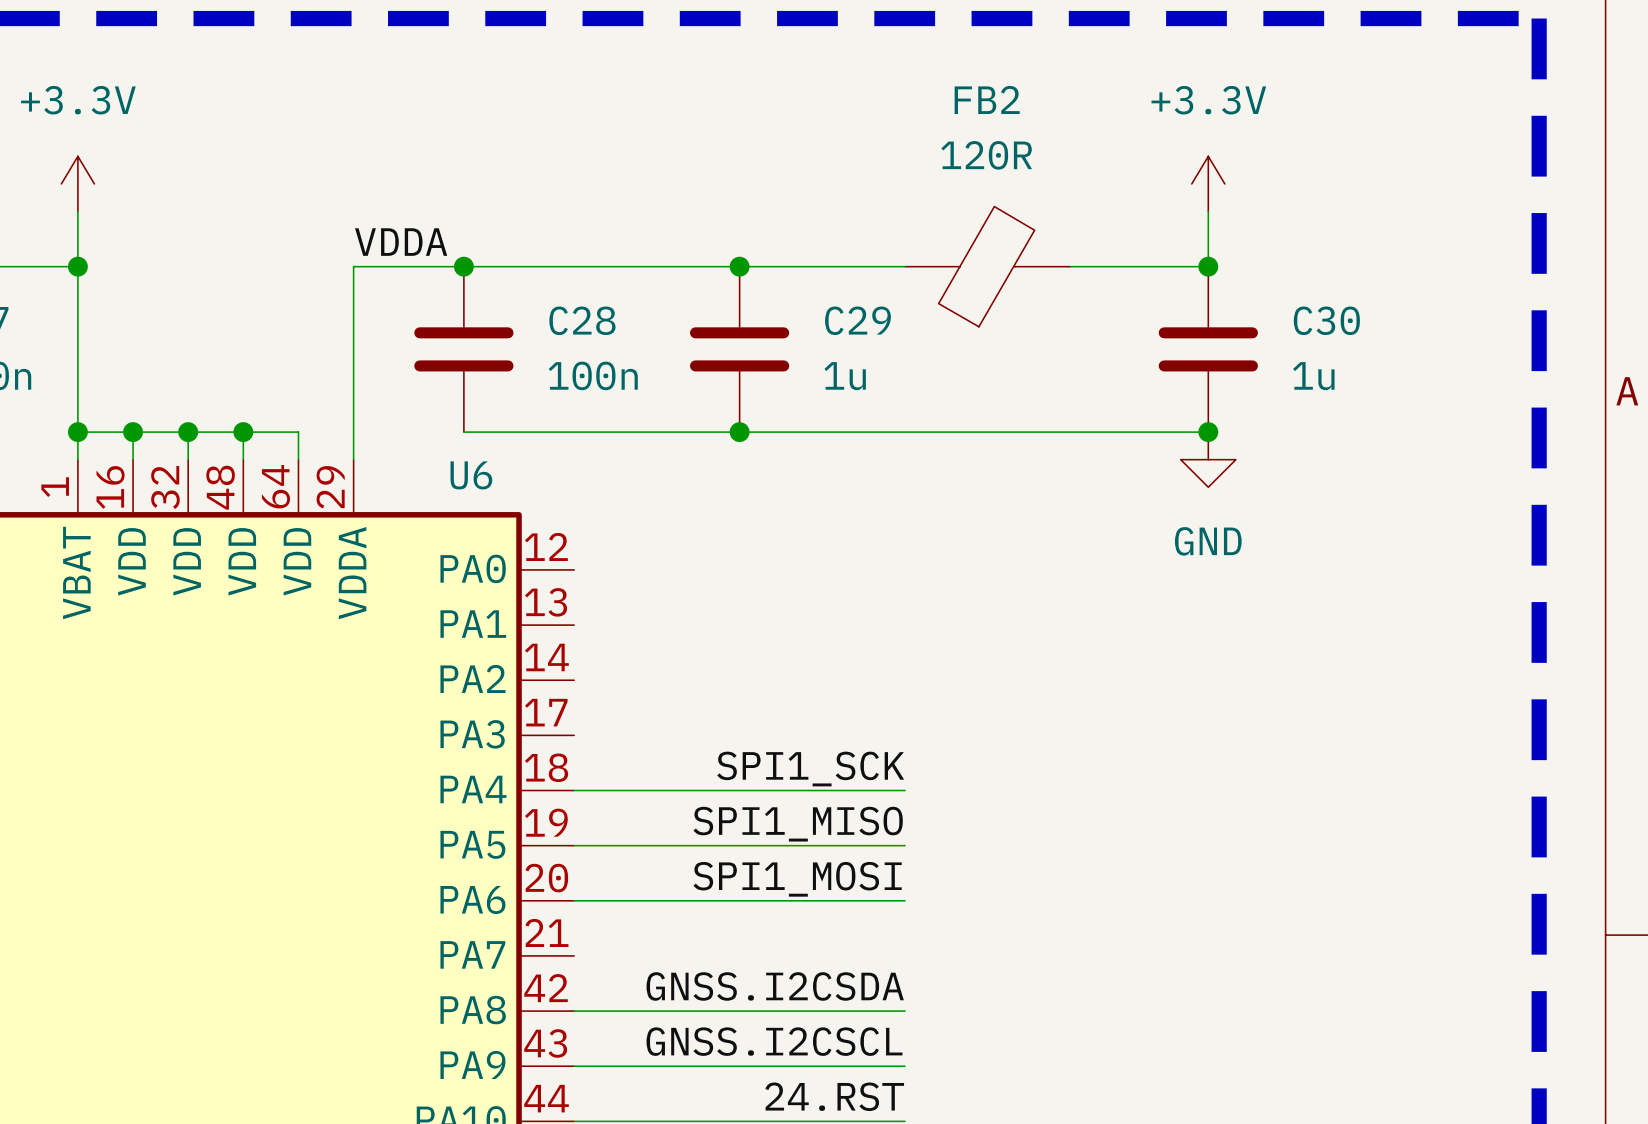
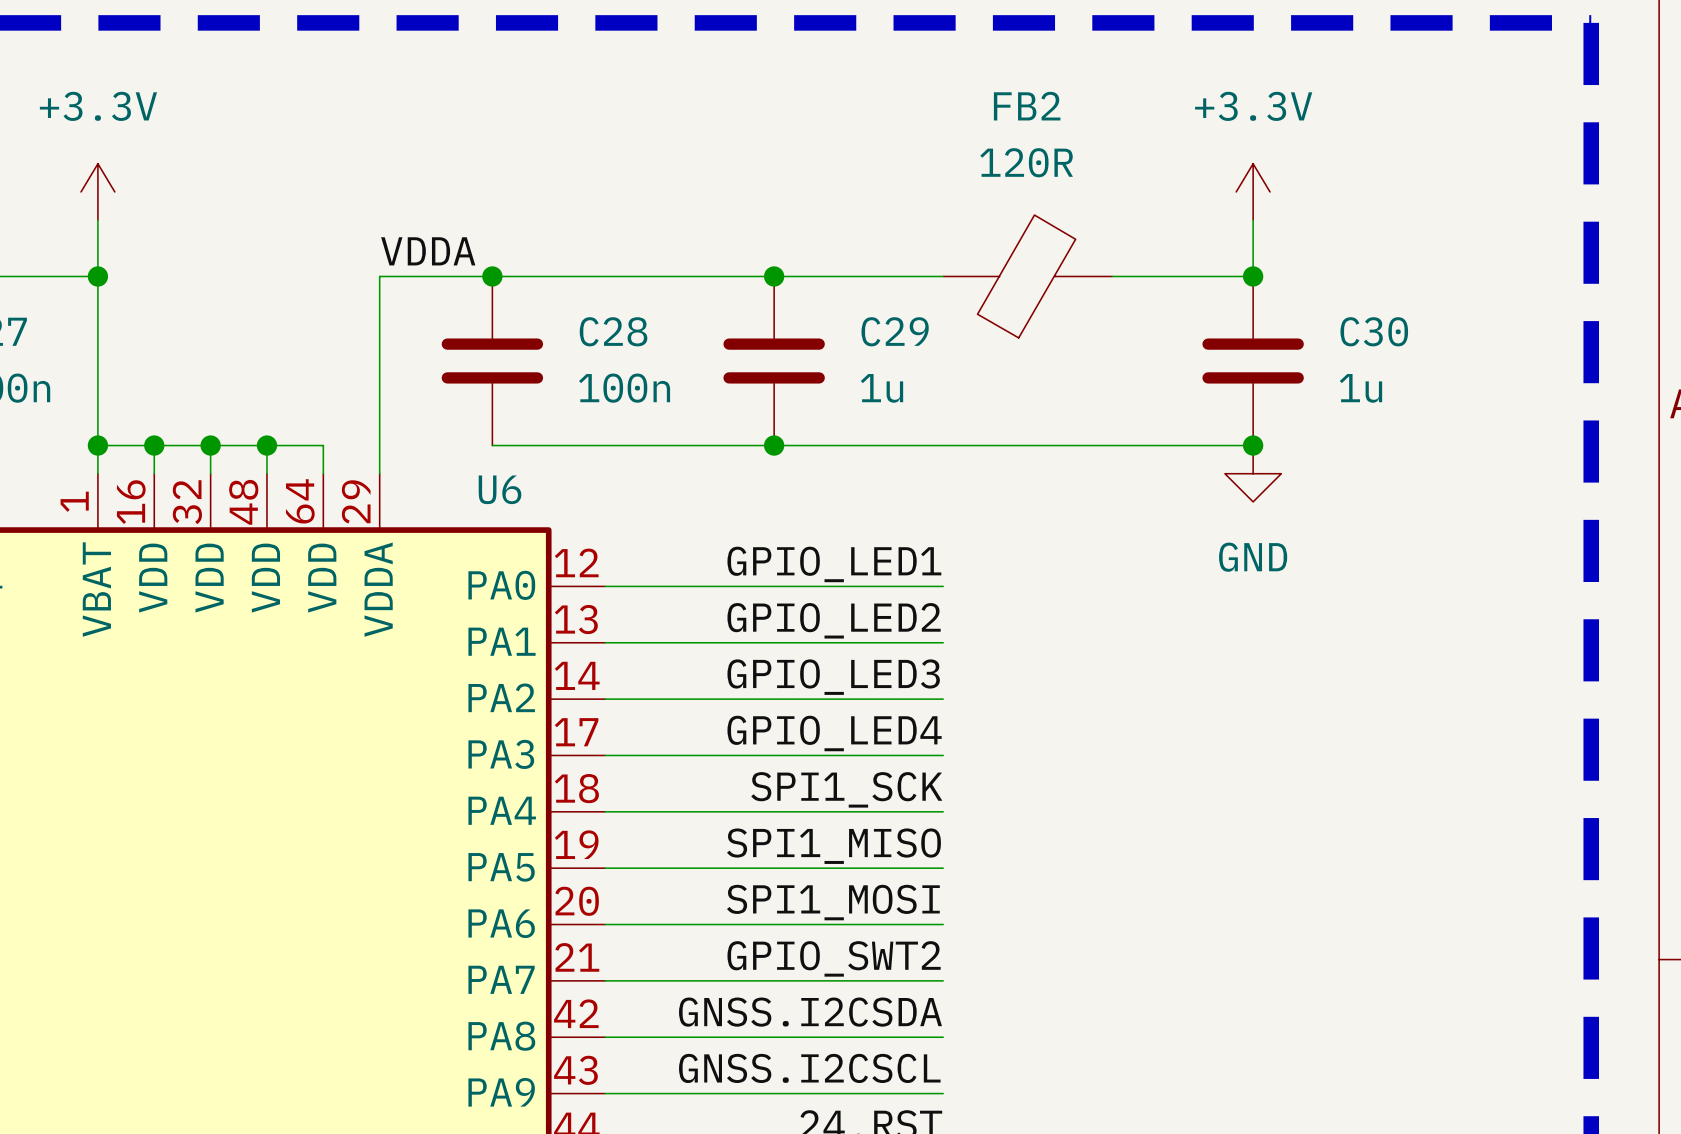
label: none -> GPIO_LED1 (834, 564)
wire: none -> (605, 586) (943, 586)
label: none -> GPIO_LED2 (834, 620)
wire: none -> (605, 642) (943, 642)
label: none -> GPIO_LED3 (833, 677)
wire: none -> (605, 699) (943, 699)
label: none -> GPIO_LED4 (834, 733)
wire: none -> (605, 755) (943, 755)
label: none -> GPIO_SWT2 (834, 958)
wire: none -> (605, 980) (943, 980)

